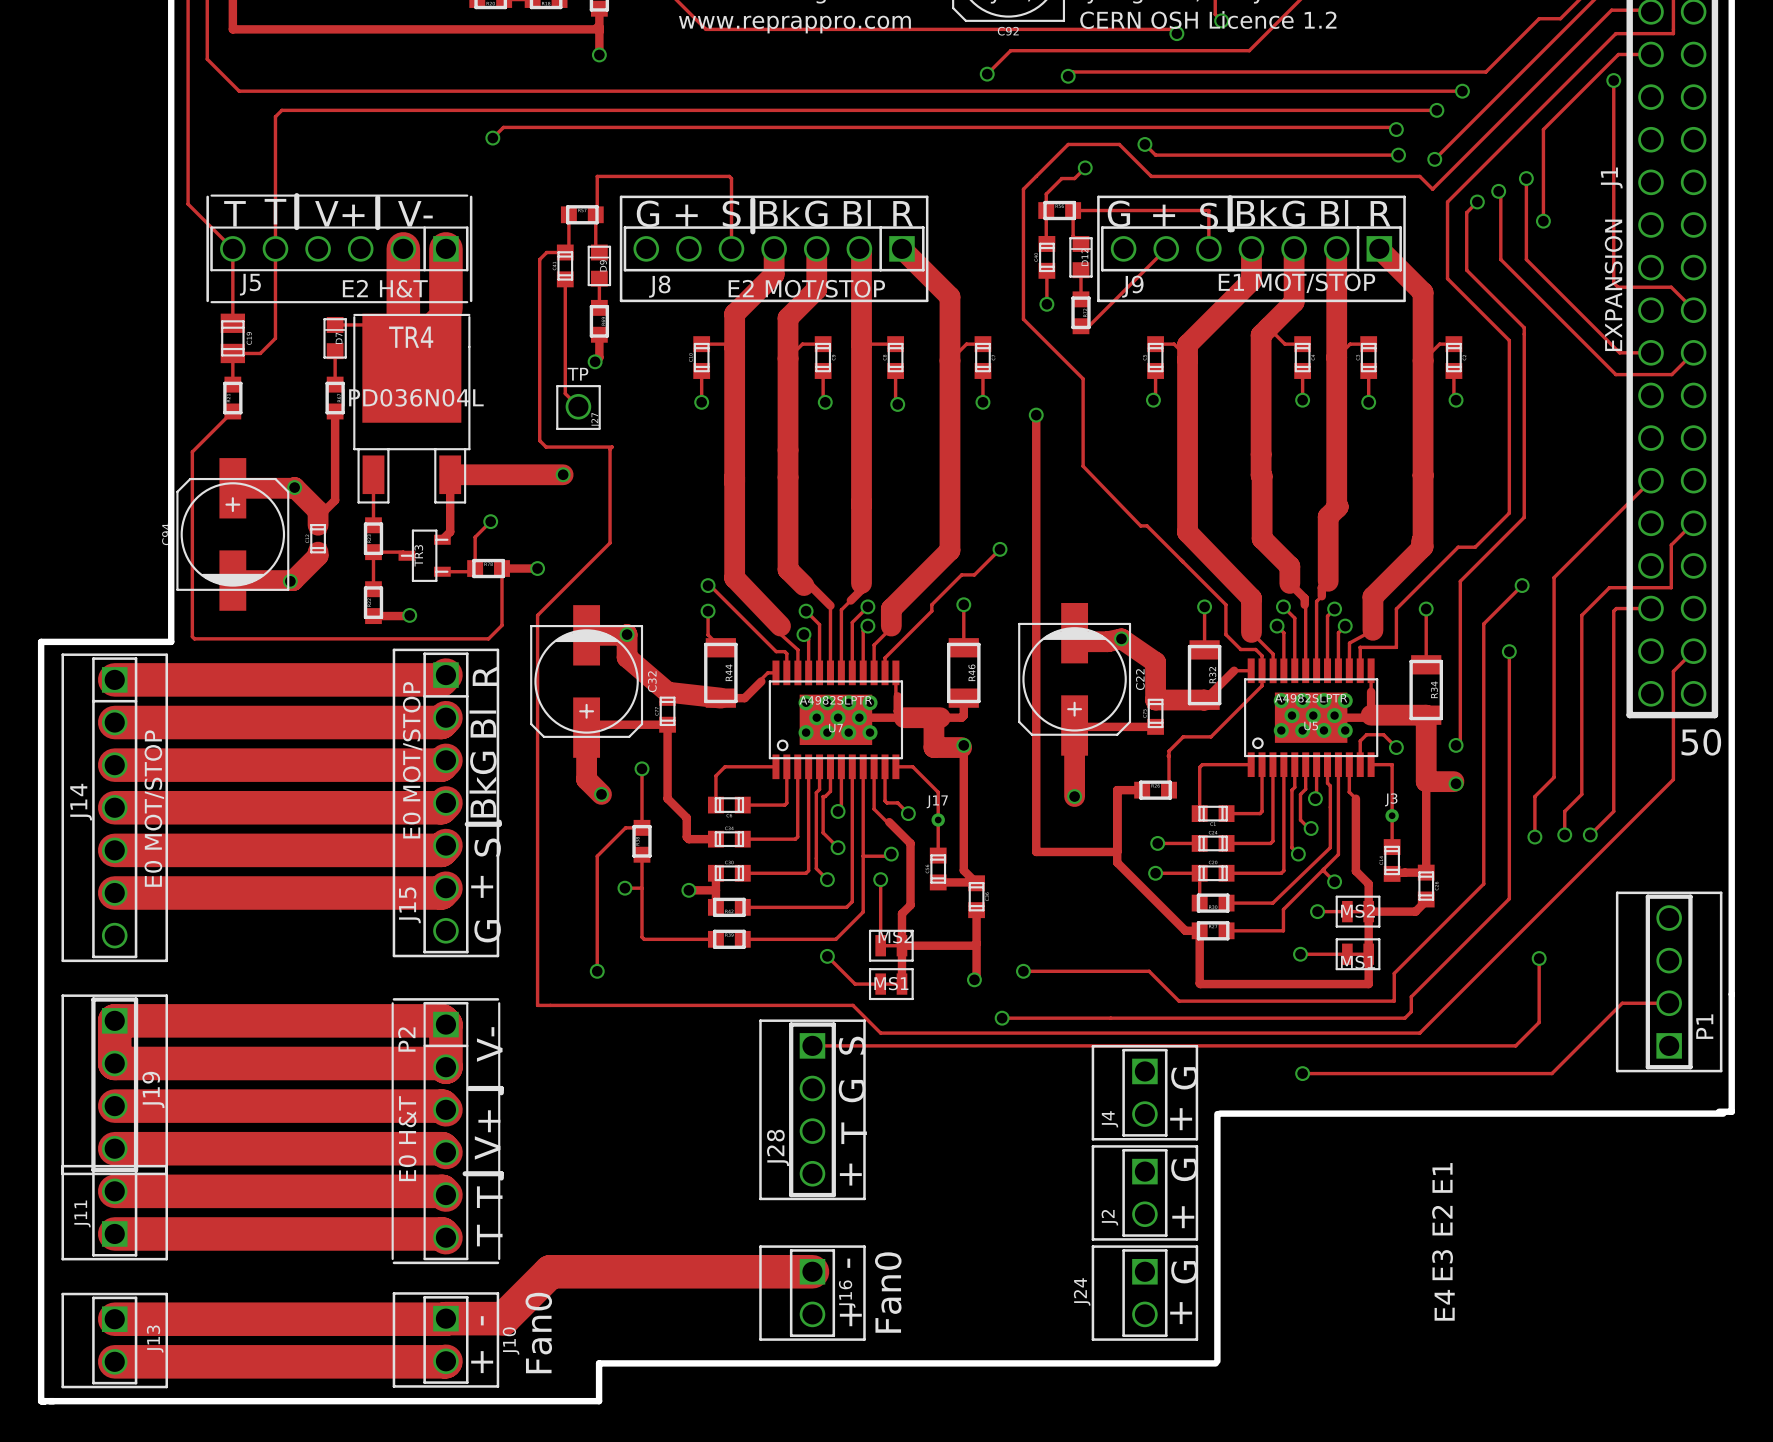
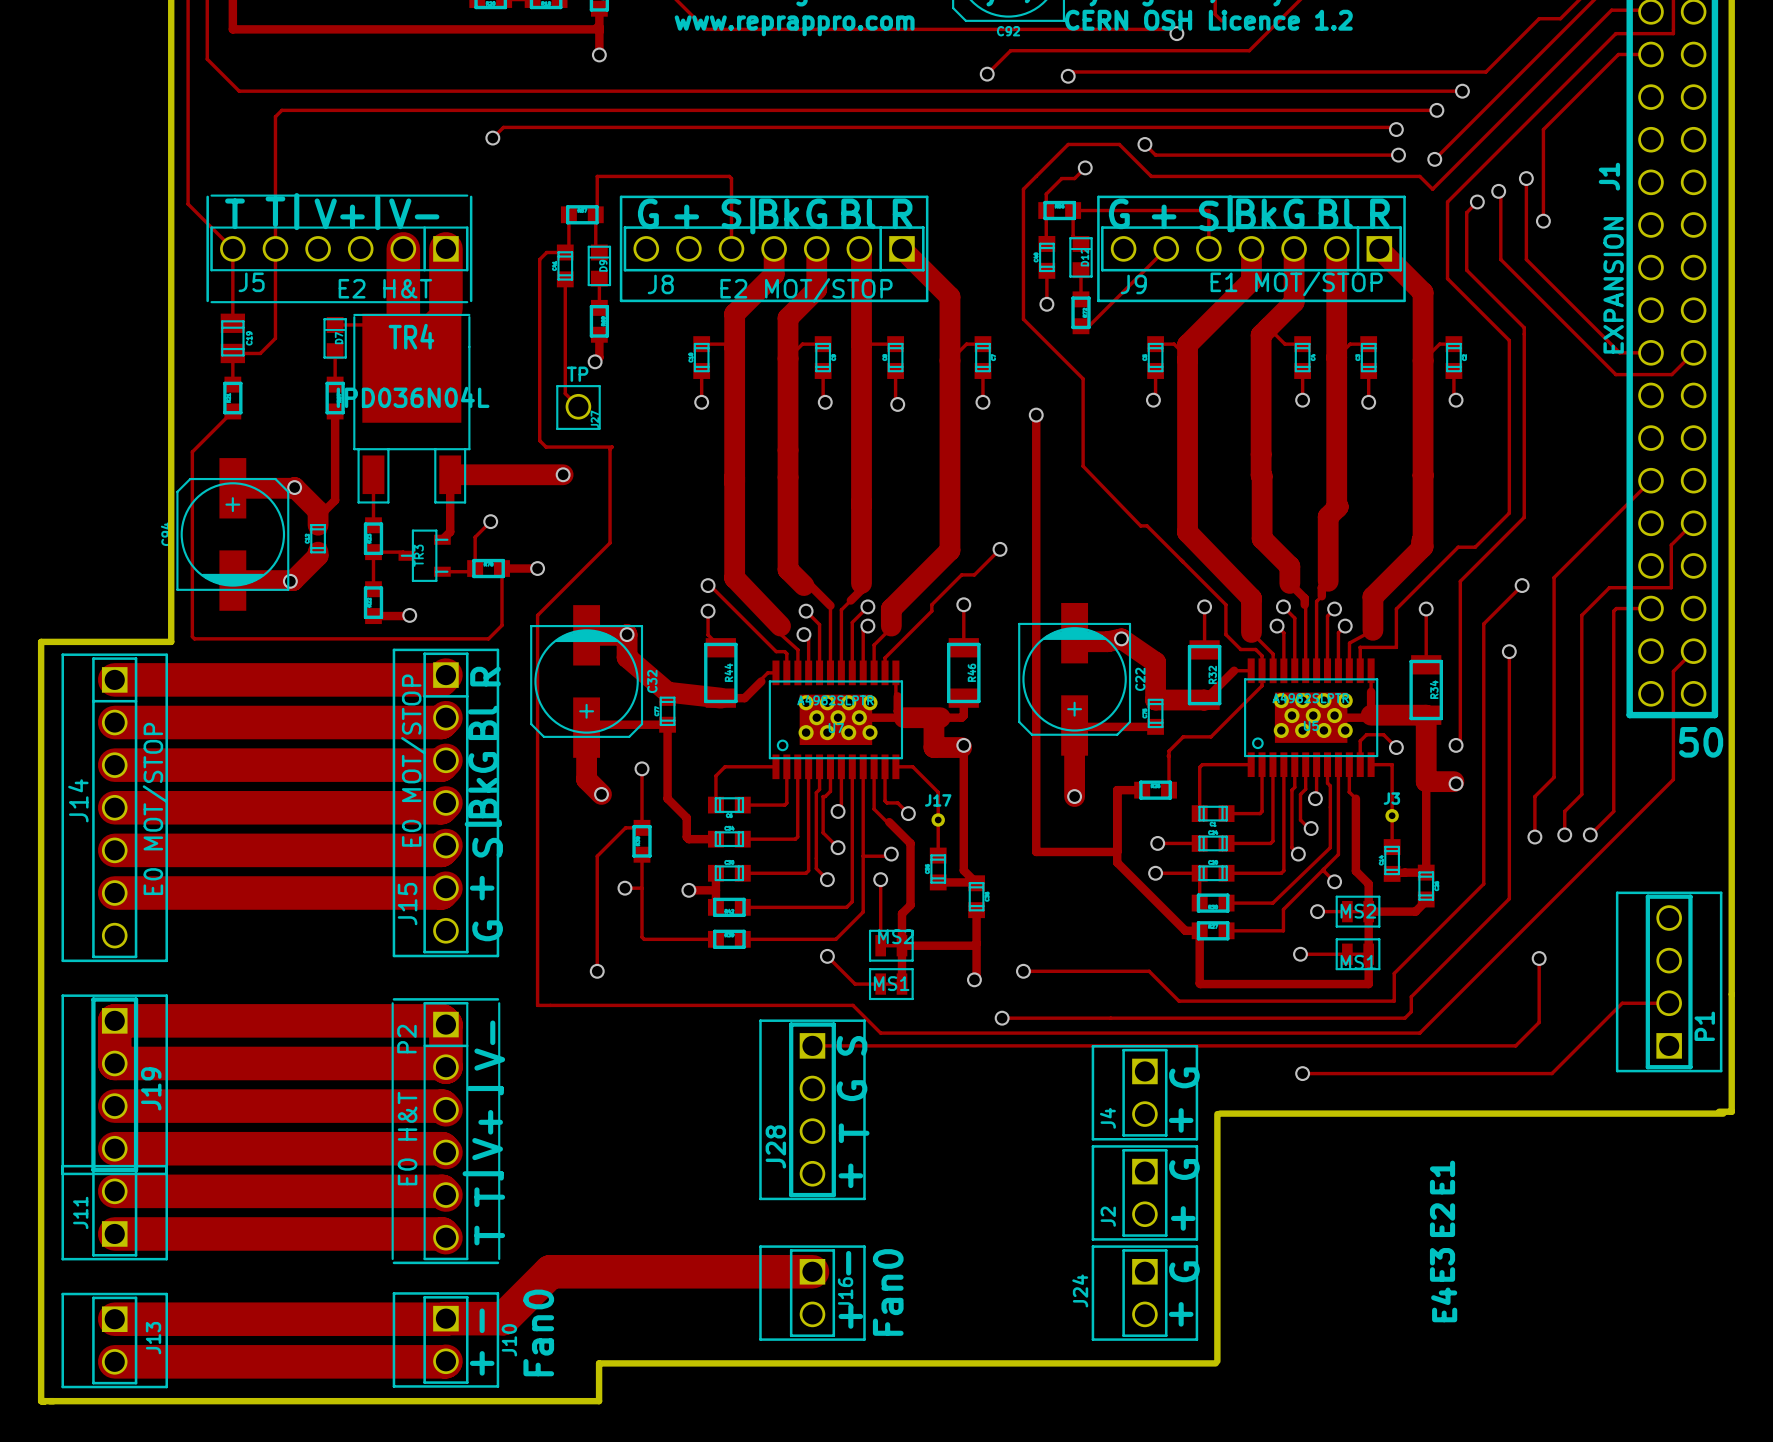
via: (1221, 20) -> none
track: (1613, 80) (1613, 282) (1618, 287) (1671, 287) (1693, 310) -> none
via: (1613, 80) -> none

